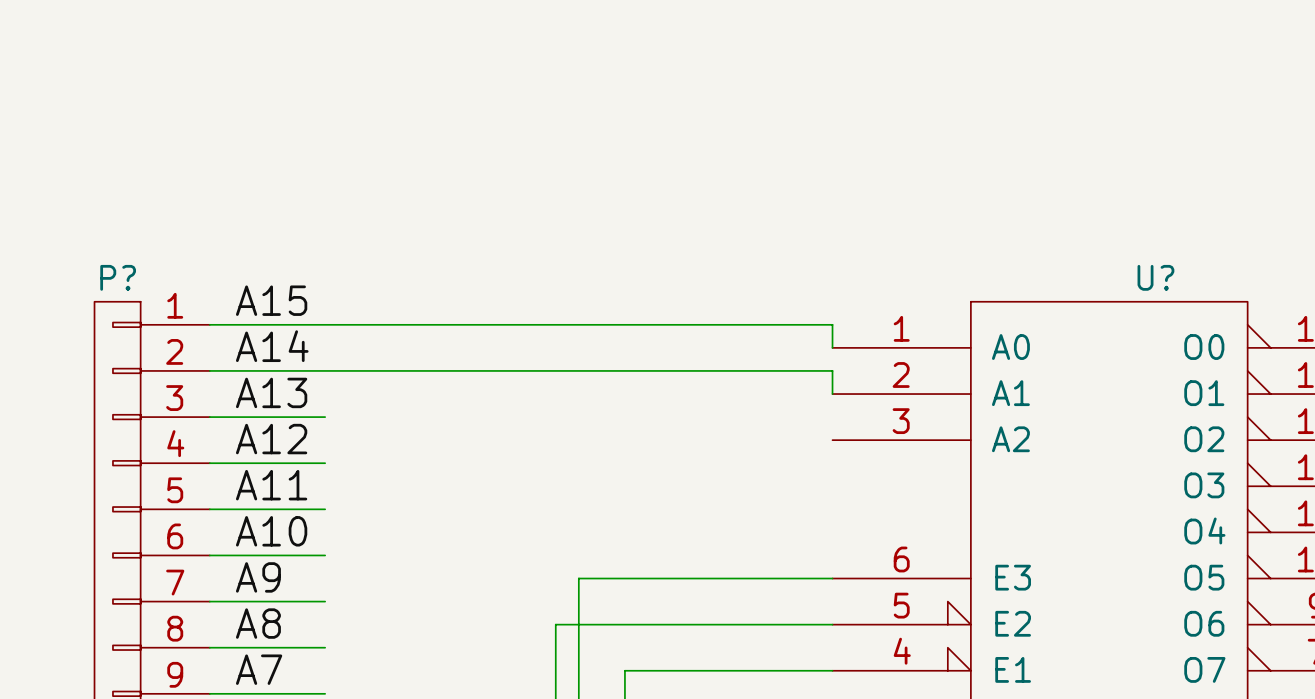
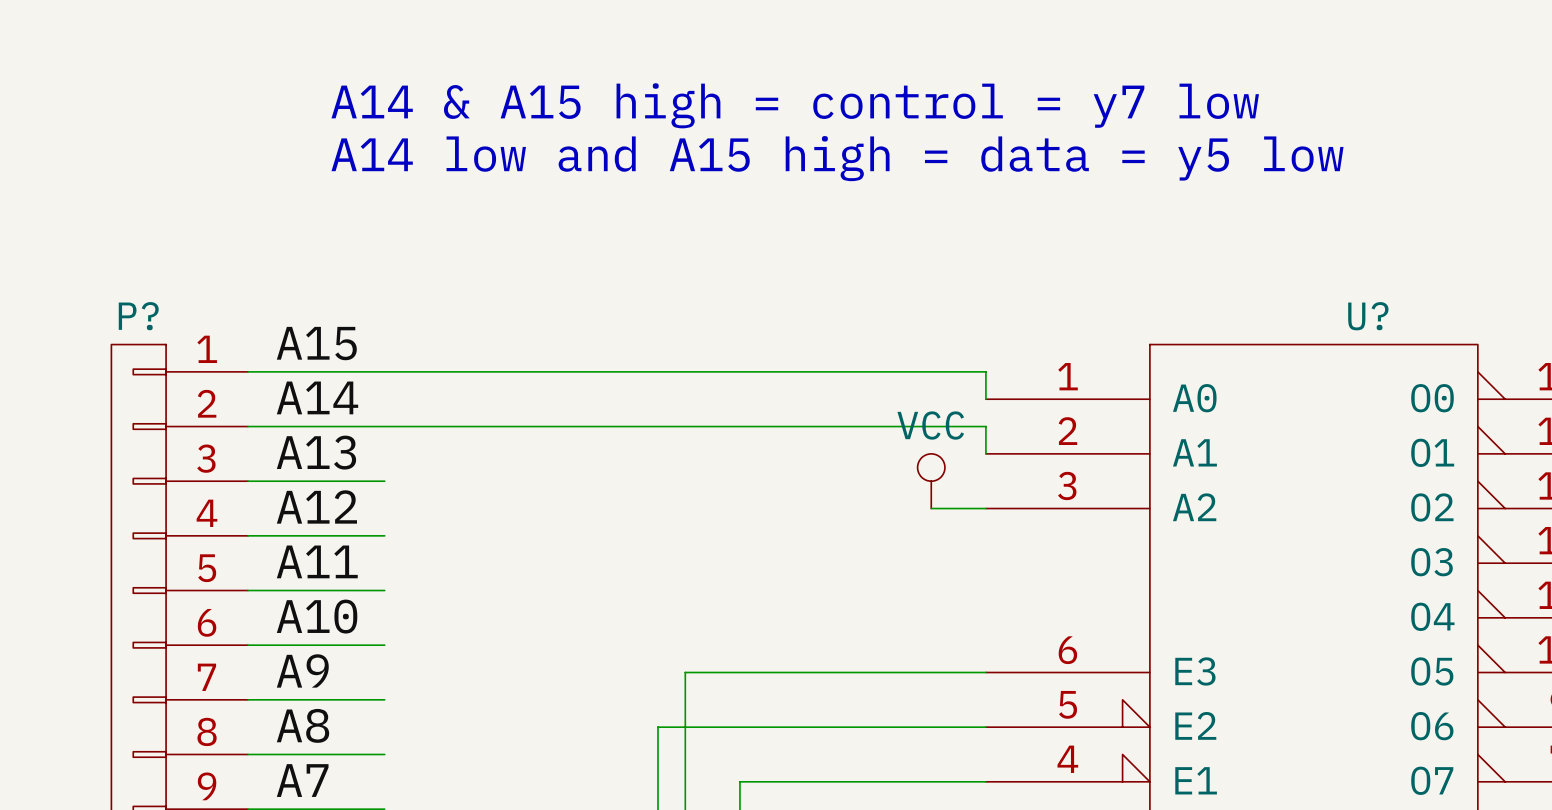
text: none -> A14 & A15 high = control = y7 low (795, 105)
text: none -> A14 low and A15 high = data = y5 low (837, 158)
power symbol: none -> VCC (931, 481)
wire: none -> (931, 508) (985, 508)

